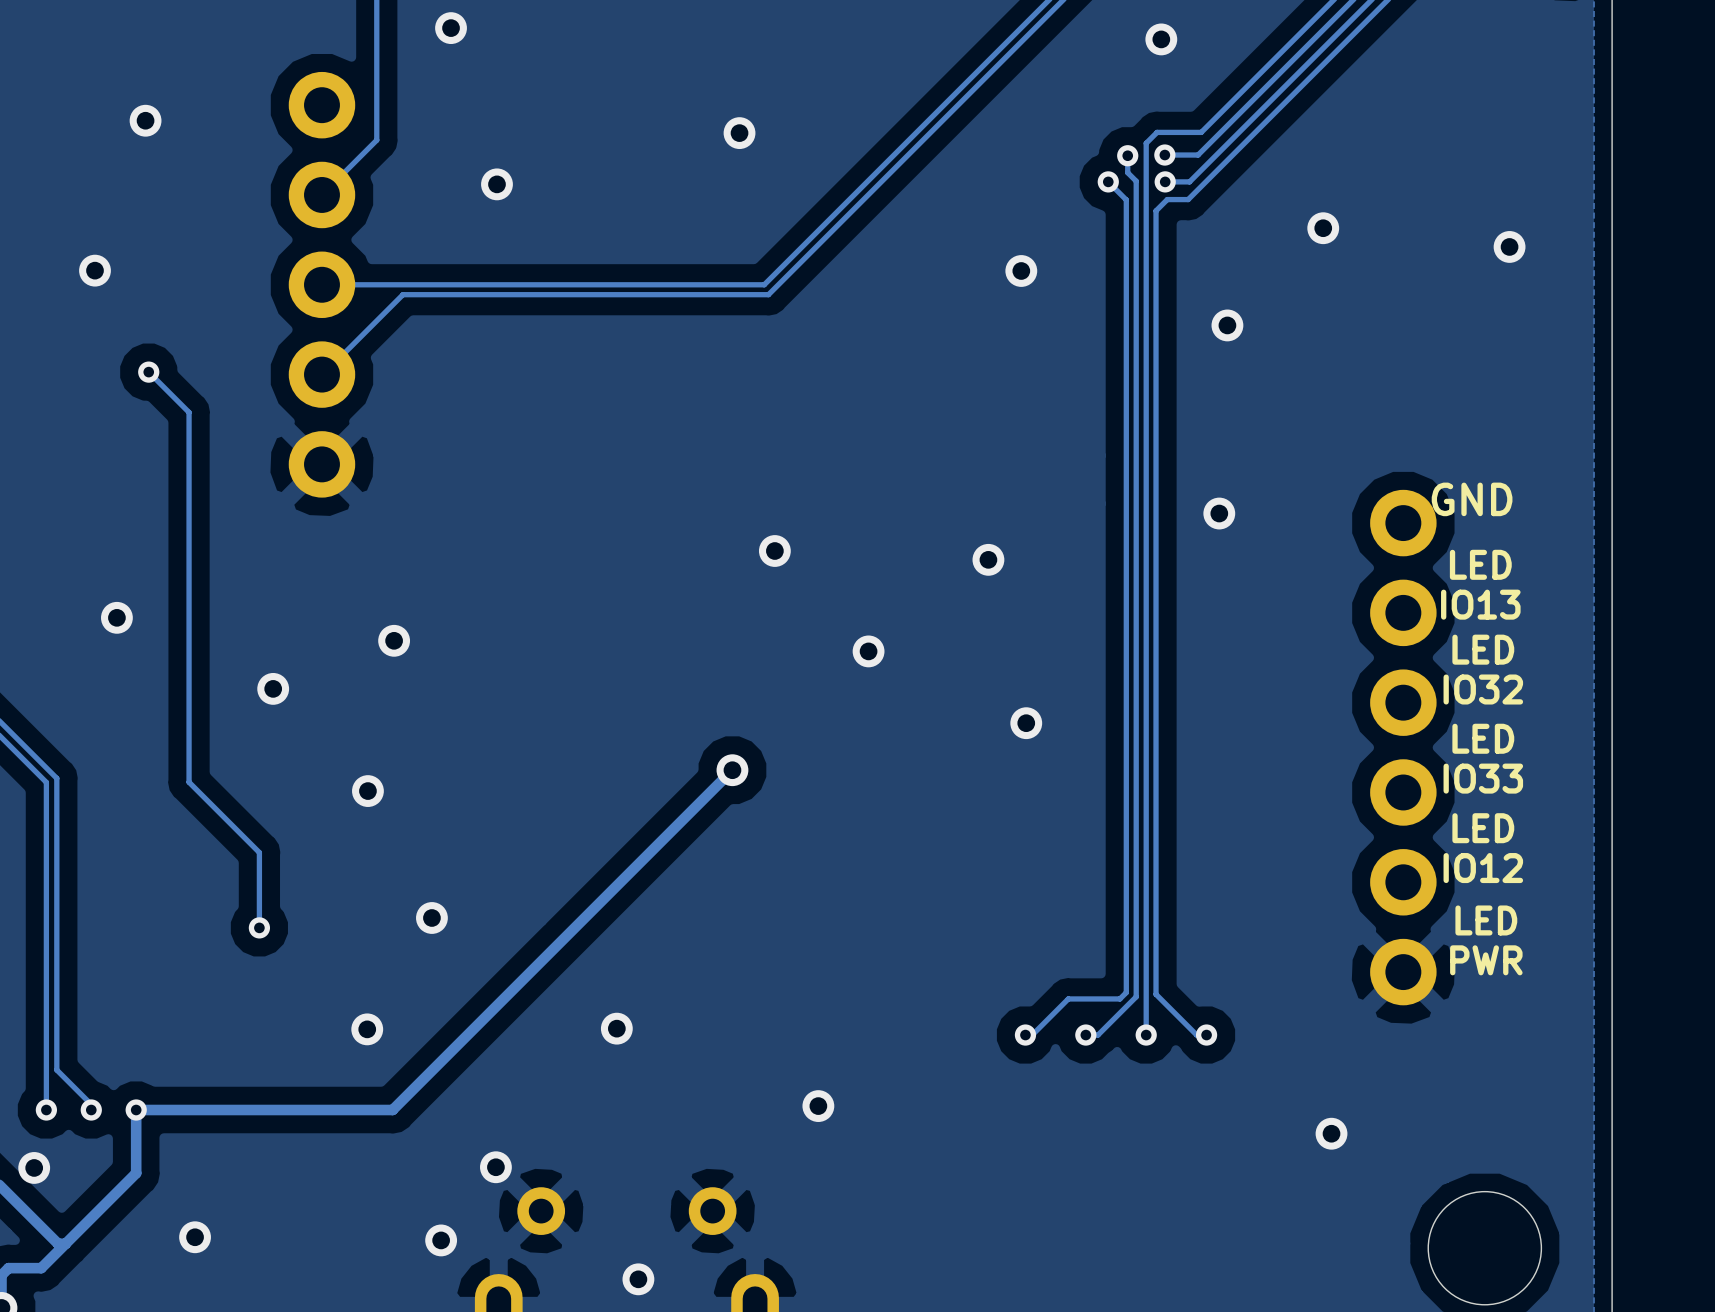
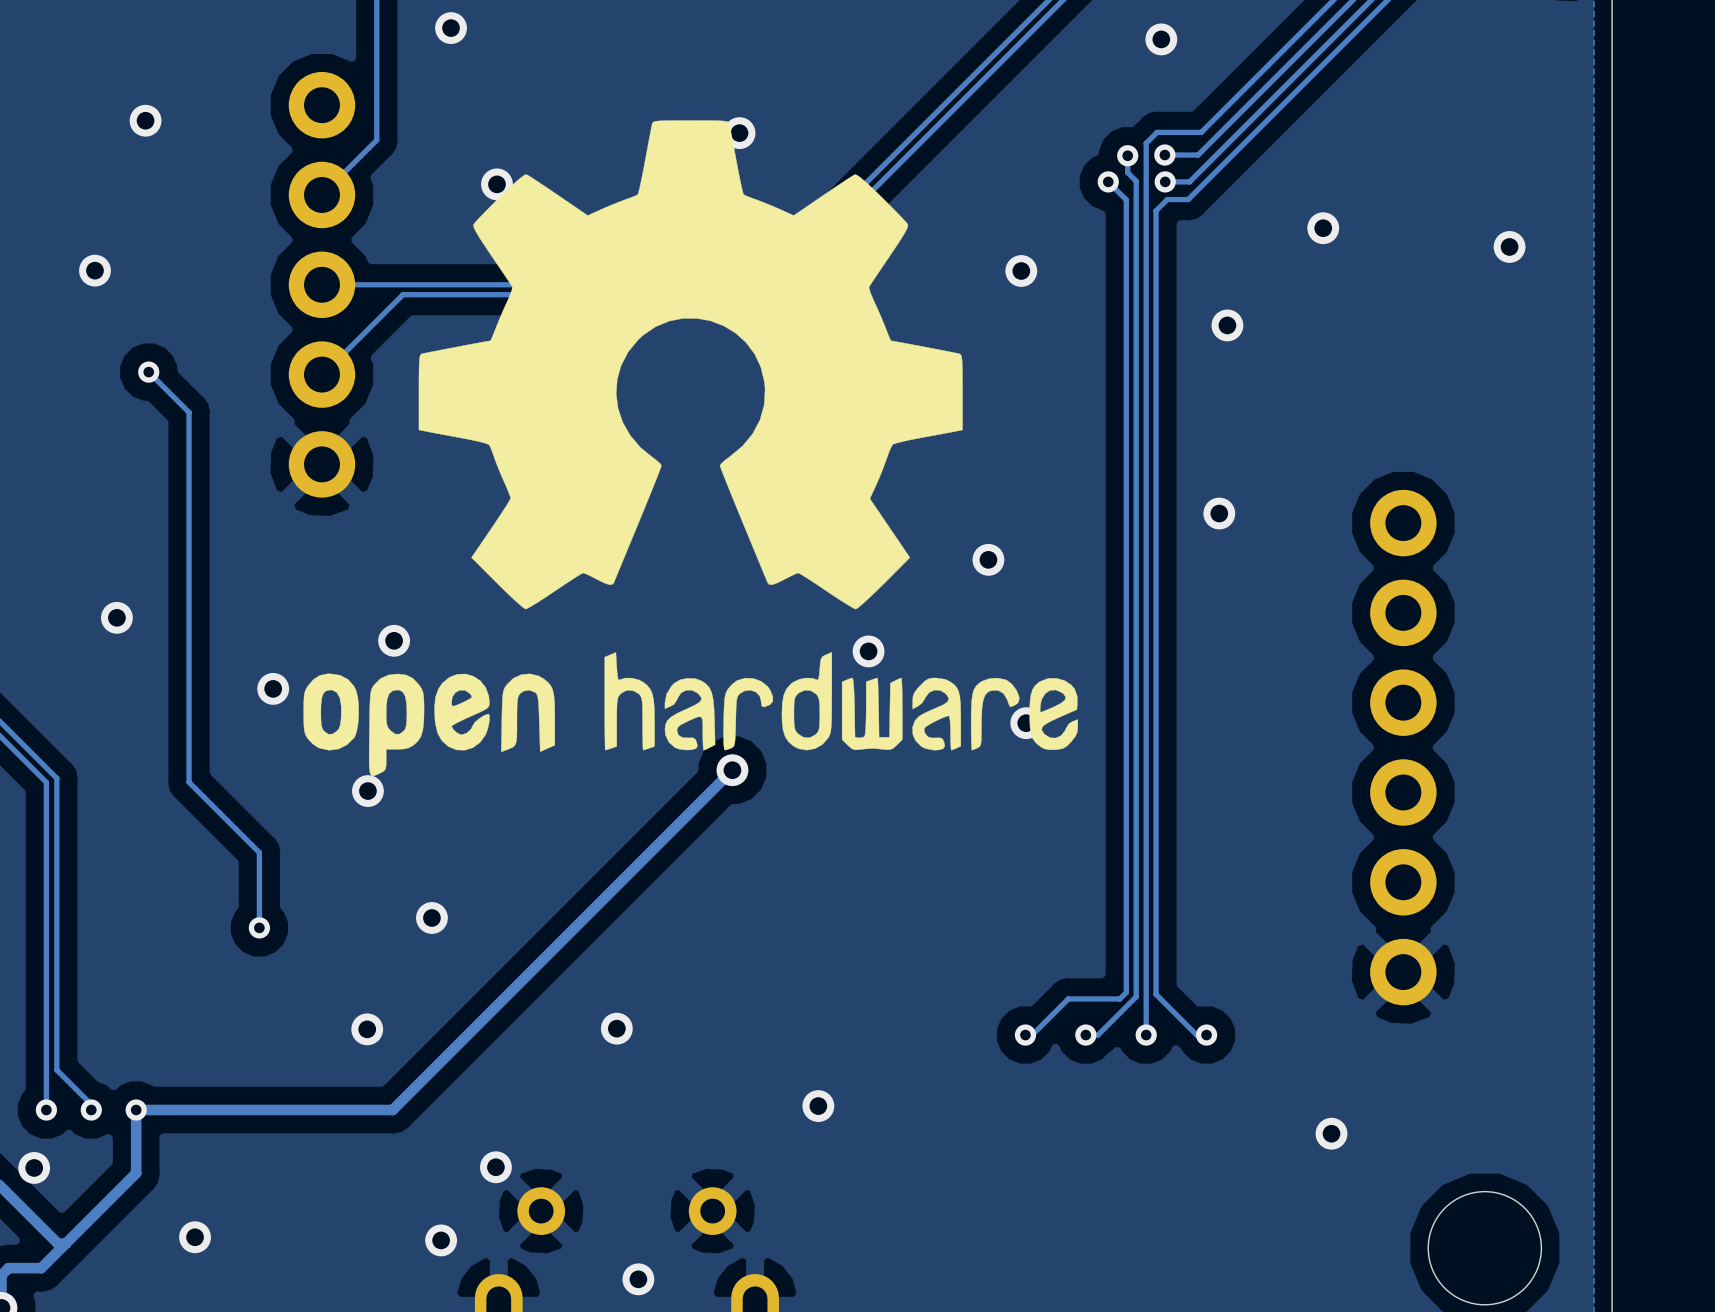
drawing: none -> [303, 120, 1078, 777]
text: GND (1472, 499) -> none
text: LED (1480, 564) -> none
text: IO13 (1480, 604) -> none
text: LED (1483, 649) -> none
text: IO32 (1483, 689) -> none
text: LED (1483, 738) -> none
text: IO33 (1483, 778) -> none
text: LED (1483, 828) -> none
text: IO12 (1483, 868) -> none
text: LED (1486, 920) -> none
text: PWR (1486, 960) -> none

